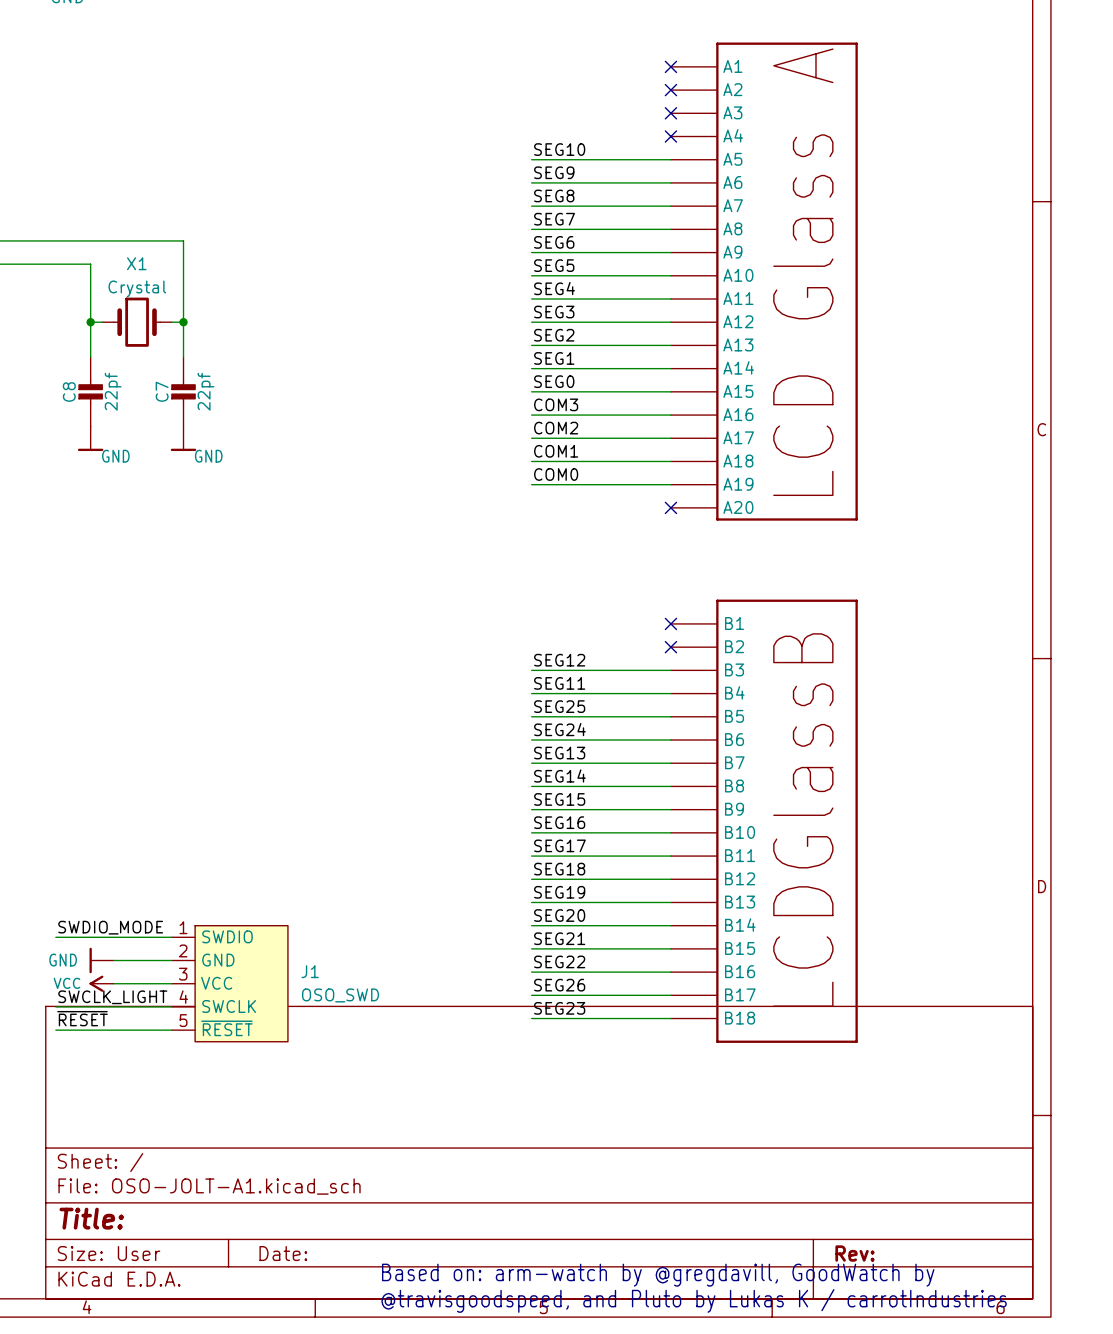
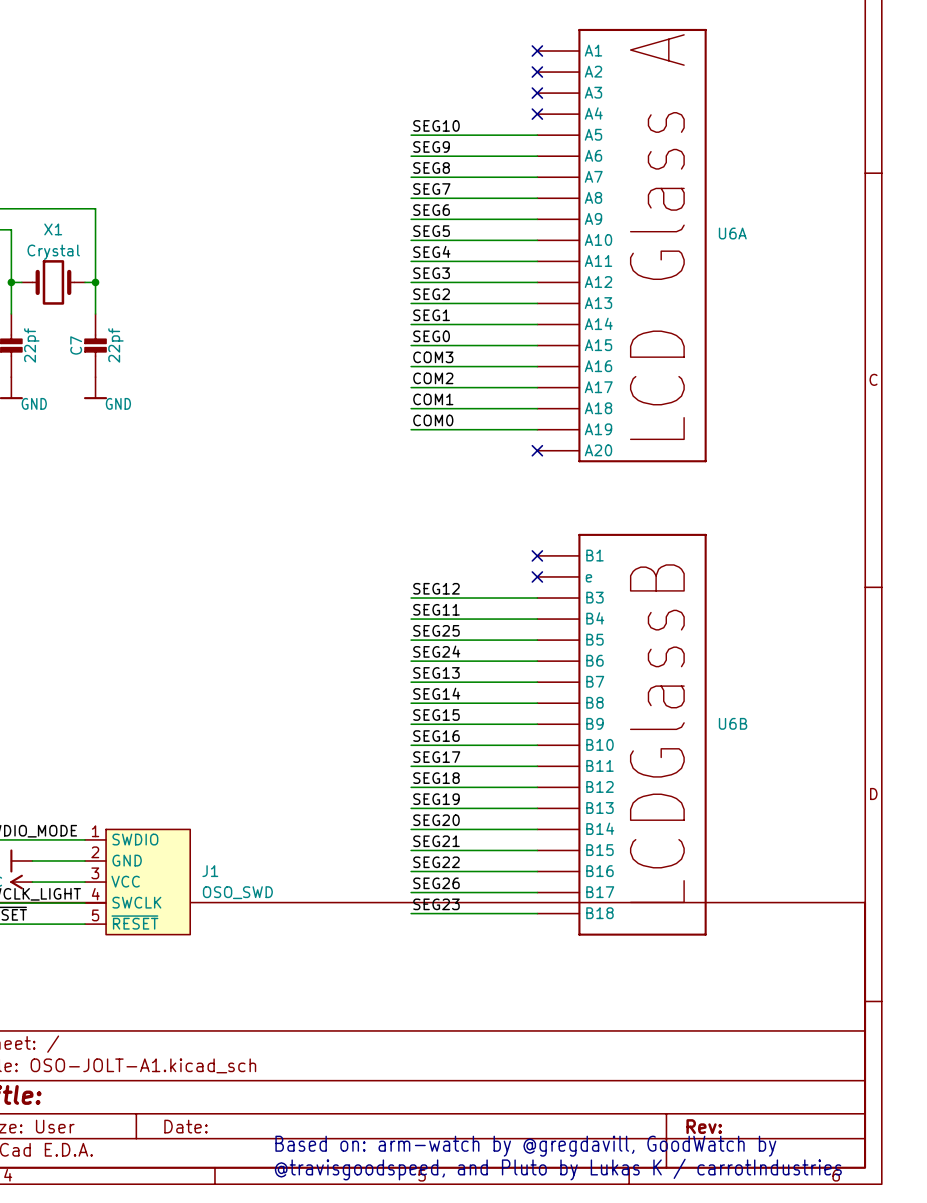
U6A name: none -> U6A (732, 233)
U6B pin name: B2 (734, 646) -> e (588, 578)
U6B name: none -> U6B (733, 723)

